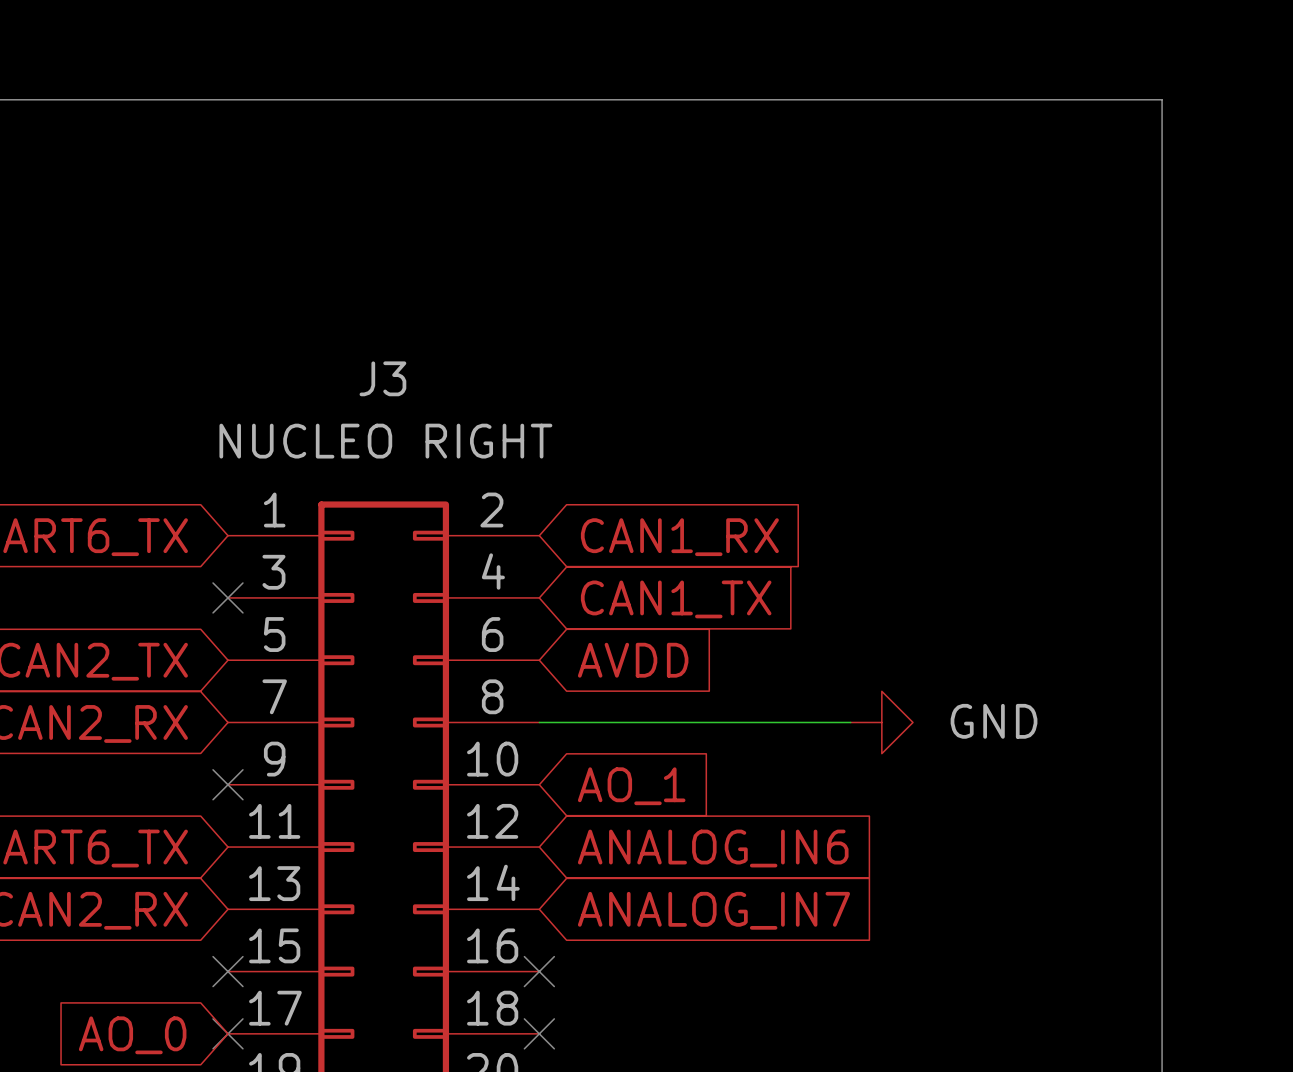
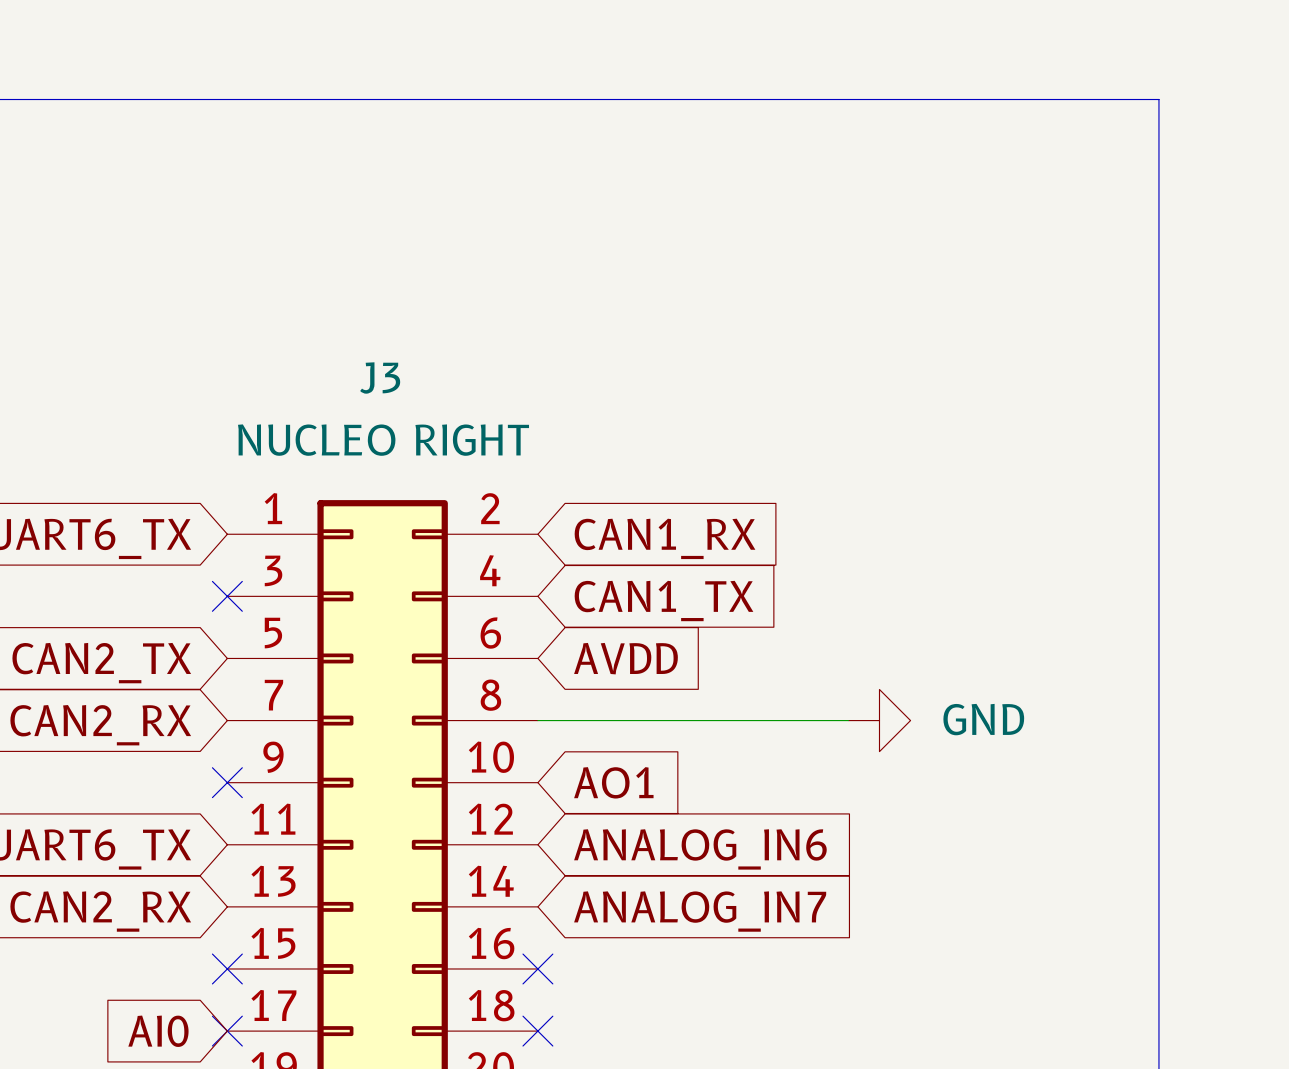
global label: AO_1 (631, 786) -> AO1 (613, 782)
global label: AO_0 (132, 1035) -> AI0 (158, 1031)

